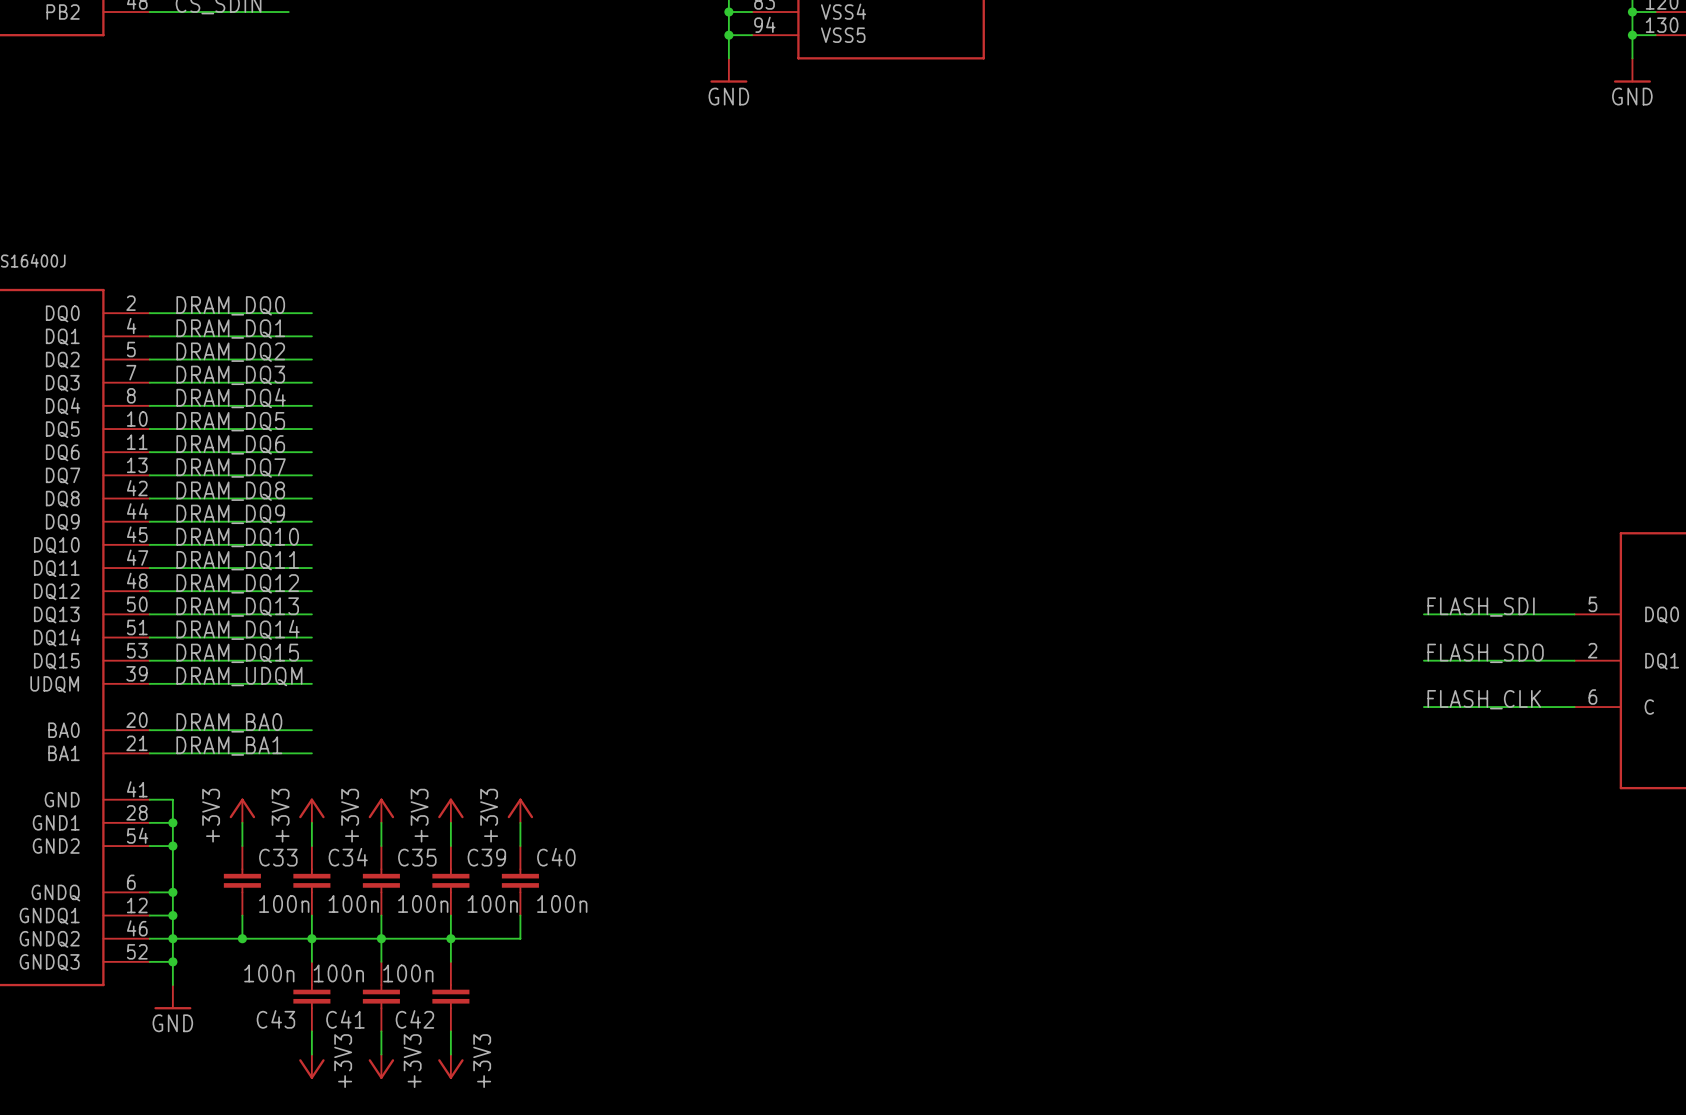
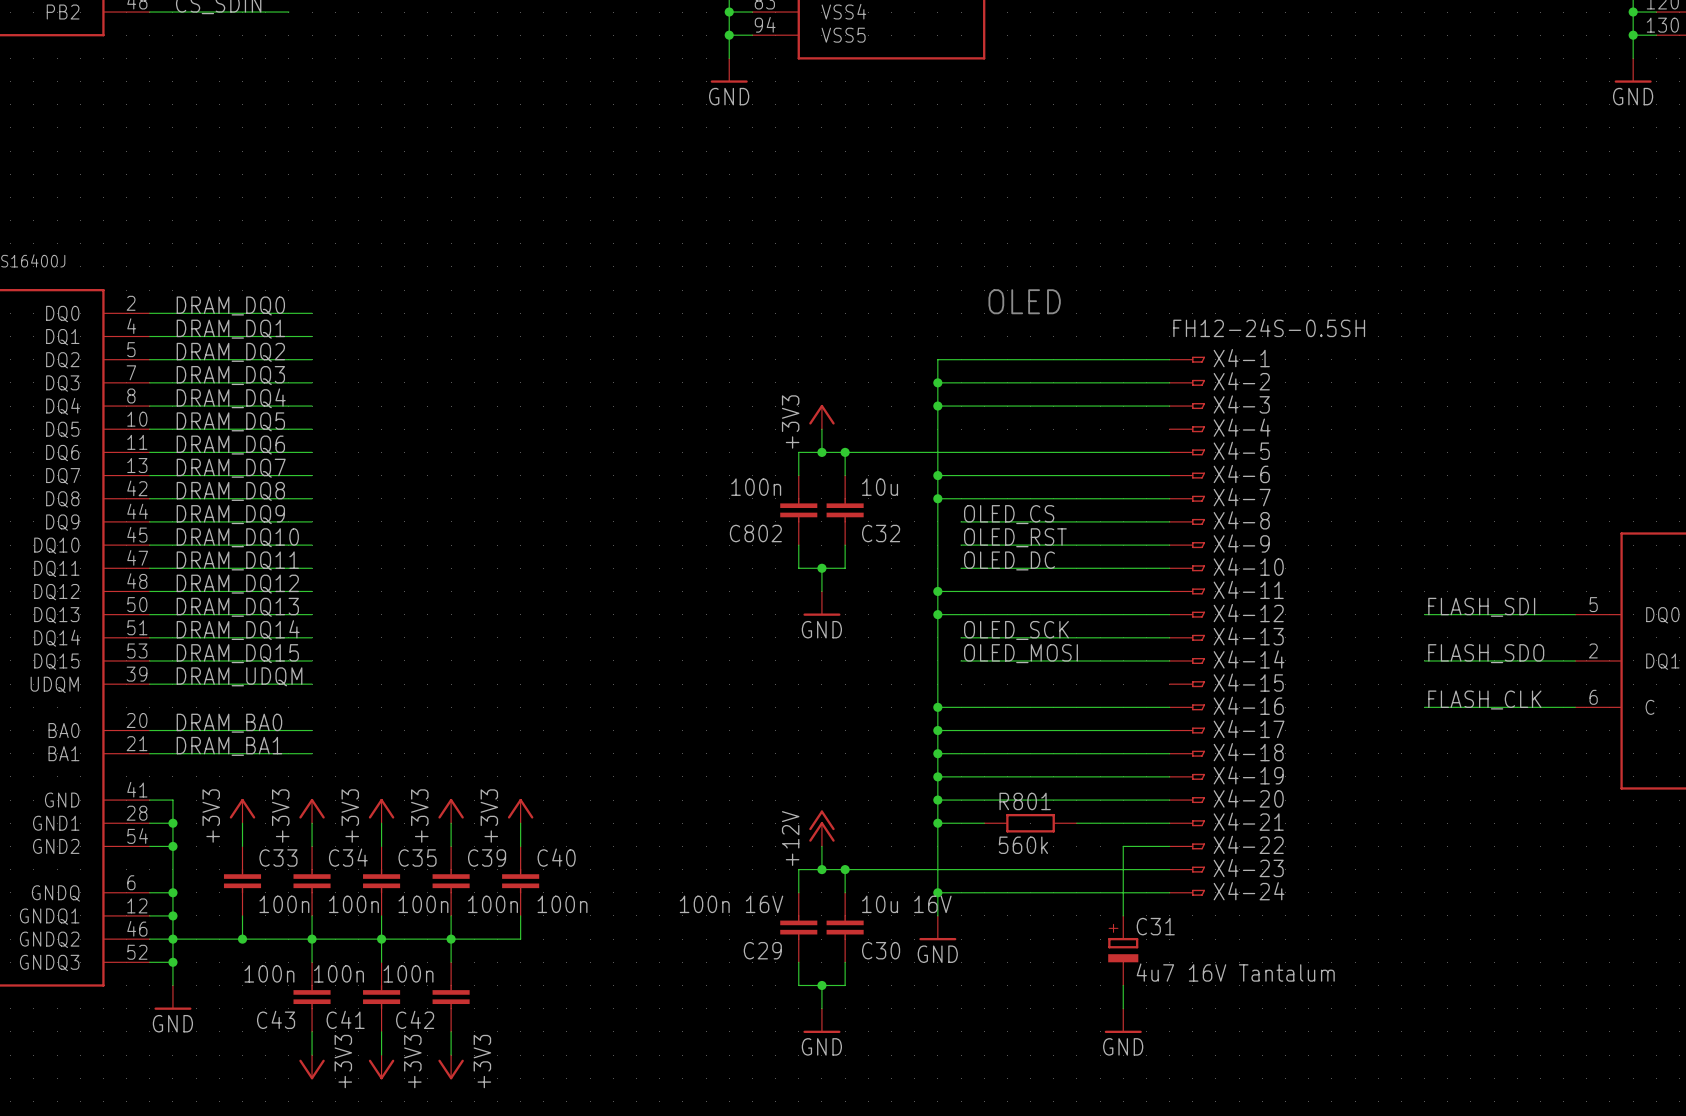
text: none -> OLED (1024, 301)
wire: none -> (1169, 359) (937, 359) (937, 915)
X4-1: none -> FH12-24S-0.5SH (1187, 359)
wire: none -> (937, 382) (1169, 382)
junction: none -> (937, 382)
X4-2: none -> (1187, 382)
wire: none -> (937, 406) (1169, 406)
junction: none -> (937, 406)
X4-3: none -> (1187, 406)
power symbol: none -> +3V3 (821, 417)
wire: none -> (821, 429) (821, 452)
X4-4: none -> (1187, 429)
junction: none -> (821, 452)
wire: none -> (845, 452) (845, 475)
junction: none -> (845, 452)
wire: none -> (1169, 452) (798, 452) (798, 475)
X4-5: none -> (1187, 452)
wire: none -> (937, 475) (1169, 475)
junction: none -> (937, 475)
X4-6: none -> (1187, 475)
wire: none -> (937, 498) (1169, 498)
junction: none -> (937, 498)
X4-7: none -> (1187, 498)
C802: none -> 100n (798, 510)
C32: none -> 10u (845, 510)
label: none -> OLED_CS (1009, 514)
wire: none -> (961, 521) (1169, 521)
X4-8: none -> (1187, 521)
label: none -> OLED_RST (1015, 537)
wire: none -> (798, 545) (798, 568) (845, 568) (845, 545)
wire: none -> (961, 545) (1169, 545)
X4-9: none -> (1187, 545)
label: none -> OLED_DC (1009, 560)
wire: none -> (821, 568) (821, 591)
junction: none -> (821, 568)
wire: none -> (961, 568) (1169, 568)
X4-10: none -> (1187, 568)
wire: none -> (937, 591) (1169, 591)
junction: none -> (937, 591)
X4-11: none -> (1187, 591)
power symbol: none -> GND (821, 603)
wire: none -> (937, 614) (1169, 614)
junction: none -> (937, 614)
X4-12: none -> (1187, 614)
label: none -> OLED_SCK (1016, 630)
wire: none -> (961, 637) (1169, 637)
X4-13: none -> (1187, 637)
label: none -> OLED_MOSI (1020, 653)
wire: none -> (961, 660) (1169, 660)
X4-14: none -> (1187, 660)
X4-15: none -> (1187, 684)
wire: none -> (937, 707) (1169, 707)
junction: none -> (937, 707)
X4-16: none -> (1187, 707)
wire: none -> (937, 730) (1169, 730)
junction: none -> (937, 730)
X4-17: none -> (1187, 730)
wire: none -> (937, 753) (1169, 753)
junction: none -> (937, 753)
X4-18: none -> (1187, 753)
wire: none -> (937, 776) (1169, 776)
junction: none -> (937, 776)
X4-19: none -> (1187, 776)
wire: none -> (937, 800) (1169, 800)
junction: none -> (937, 800)
X4-20: none -> (1187, 800)
wire: none -> (937, 823) (984, 823)
junction: none -> (937, 823)
R801: none -> 560k (1030, 823)
wire: none -> (1076, 823) (1169, 823)
X4-21: none -> (1187, 823)
power symbol: none -> +12V (821, 828)
wire: none -> (821, 846) (821, 869)
wire: none -> (1169, 846) (1123, 846) (1123, 915)
X4-22: none -> (1187, 846)
junction: none -> (821, 869)
wire: none -> (845, 869) (845, 892)
junction: none -> (845, 869)
wire: none -> (1169, 869) (798, 869) (798, 892)
X4-23: none -> (1187, 869)
wire: none -> (937, 892) (1169, 892)
junction: none -> (937, 892)
X4-24: none -> (1187, 892)
C29: none -> 100n 16V (798, 927)
C30: none -> 10u 16V (845, 927)
power symbol: none -> GND (937, 928)
C31: none -> 4u7 16V Tantalum (1123, 950)
wire: none -> (798, 962) (798, 985) (845, 985) (845, 962)
wire: none -> (821, 985) (821, 1008)
junction: none -> (821, 985)
wire: none -> (1123, 985) (1123, 1008)
power symbol: none -> GND (821, 1020)
power symbol: none -> GND (1123, 1020)

